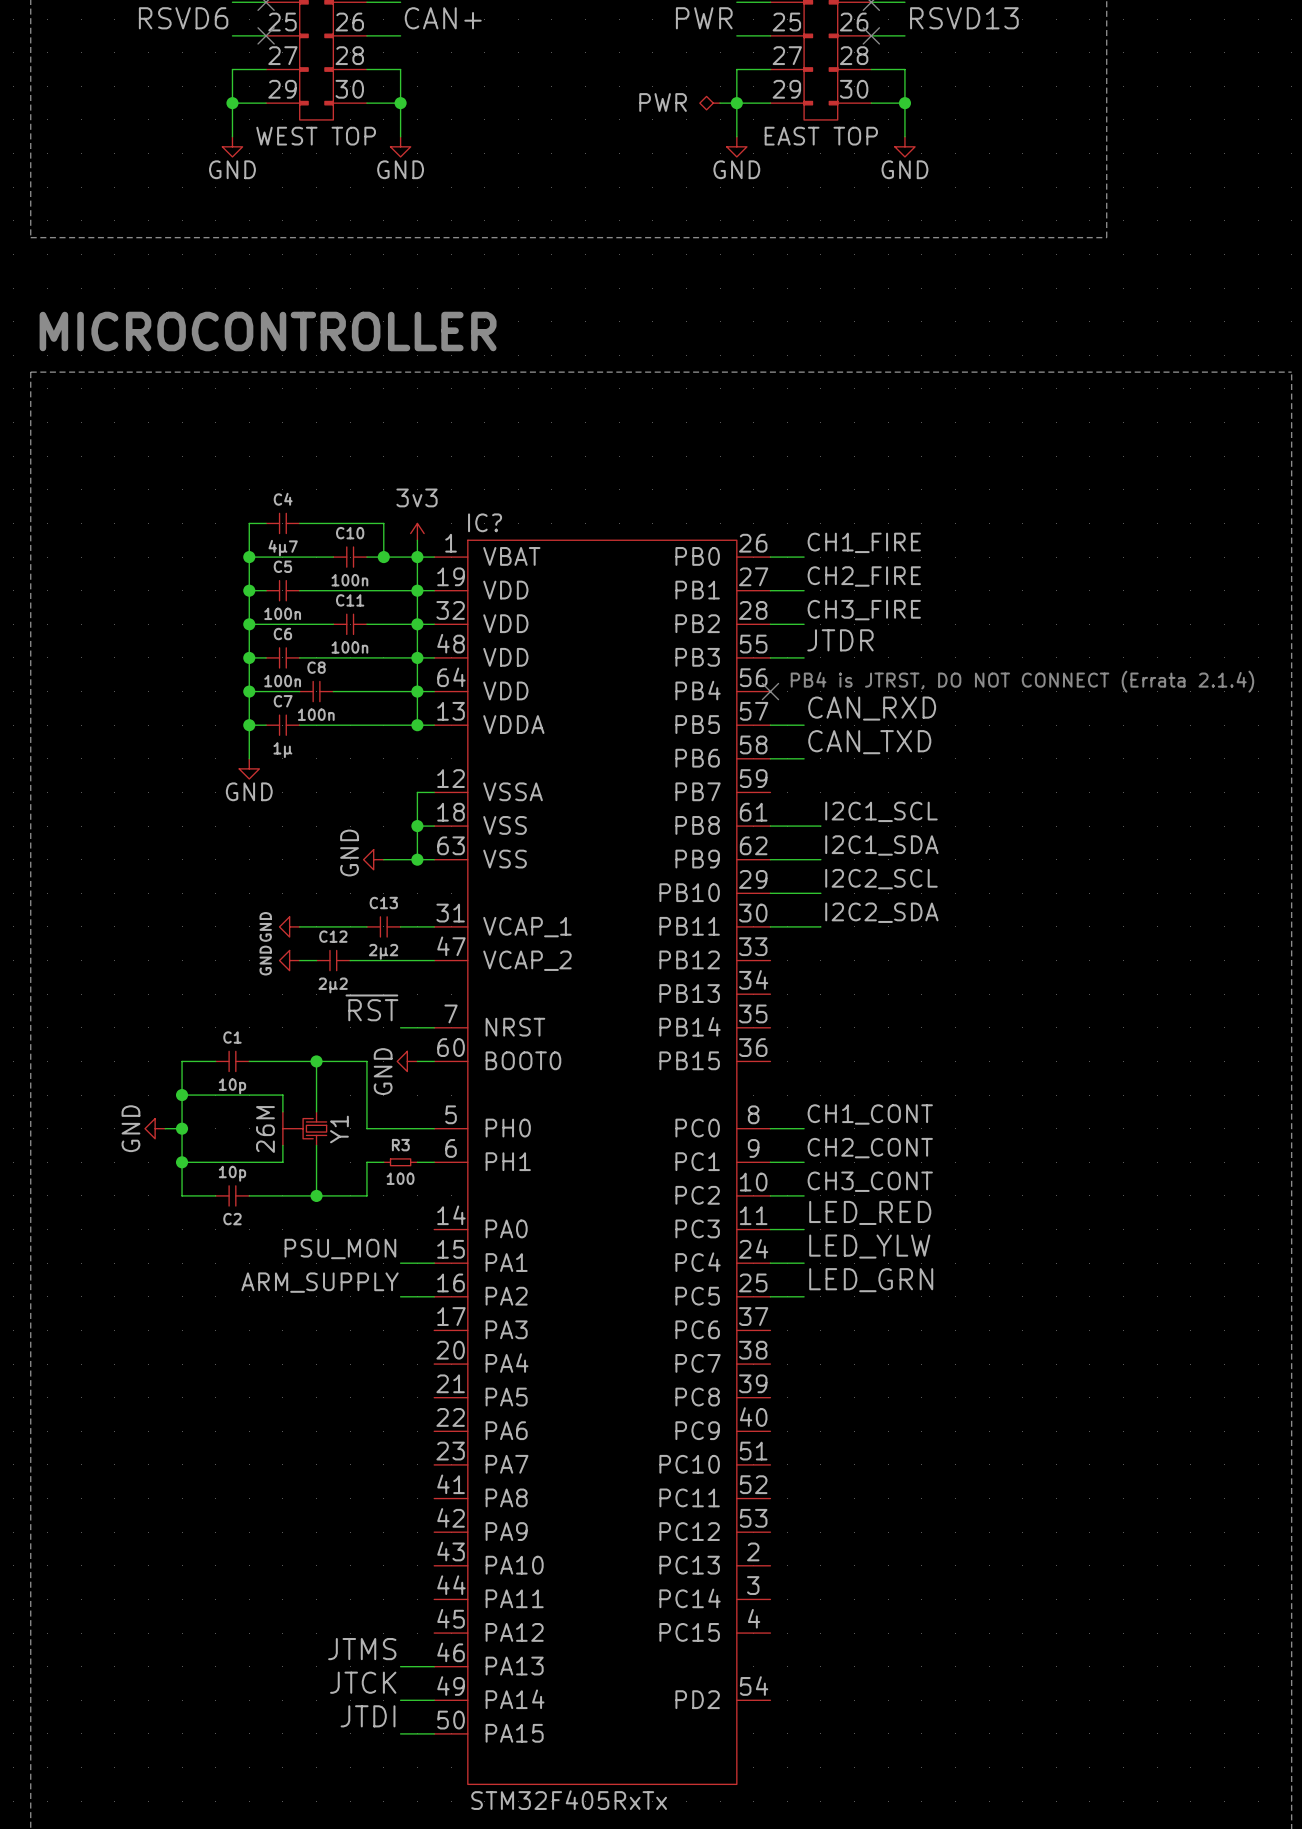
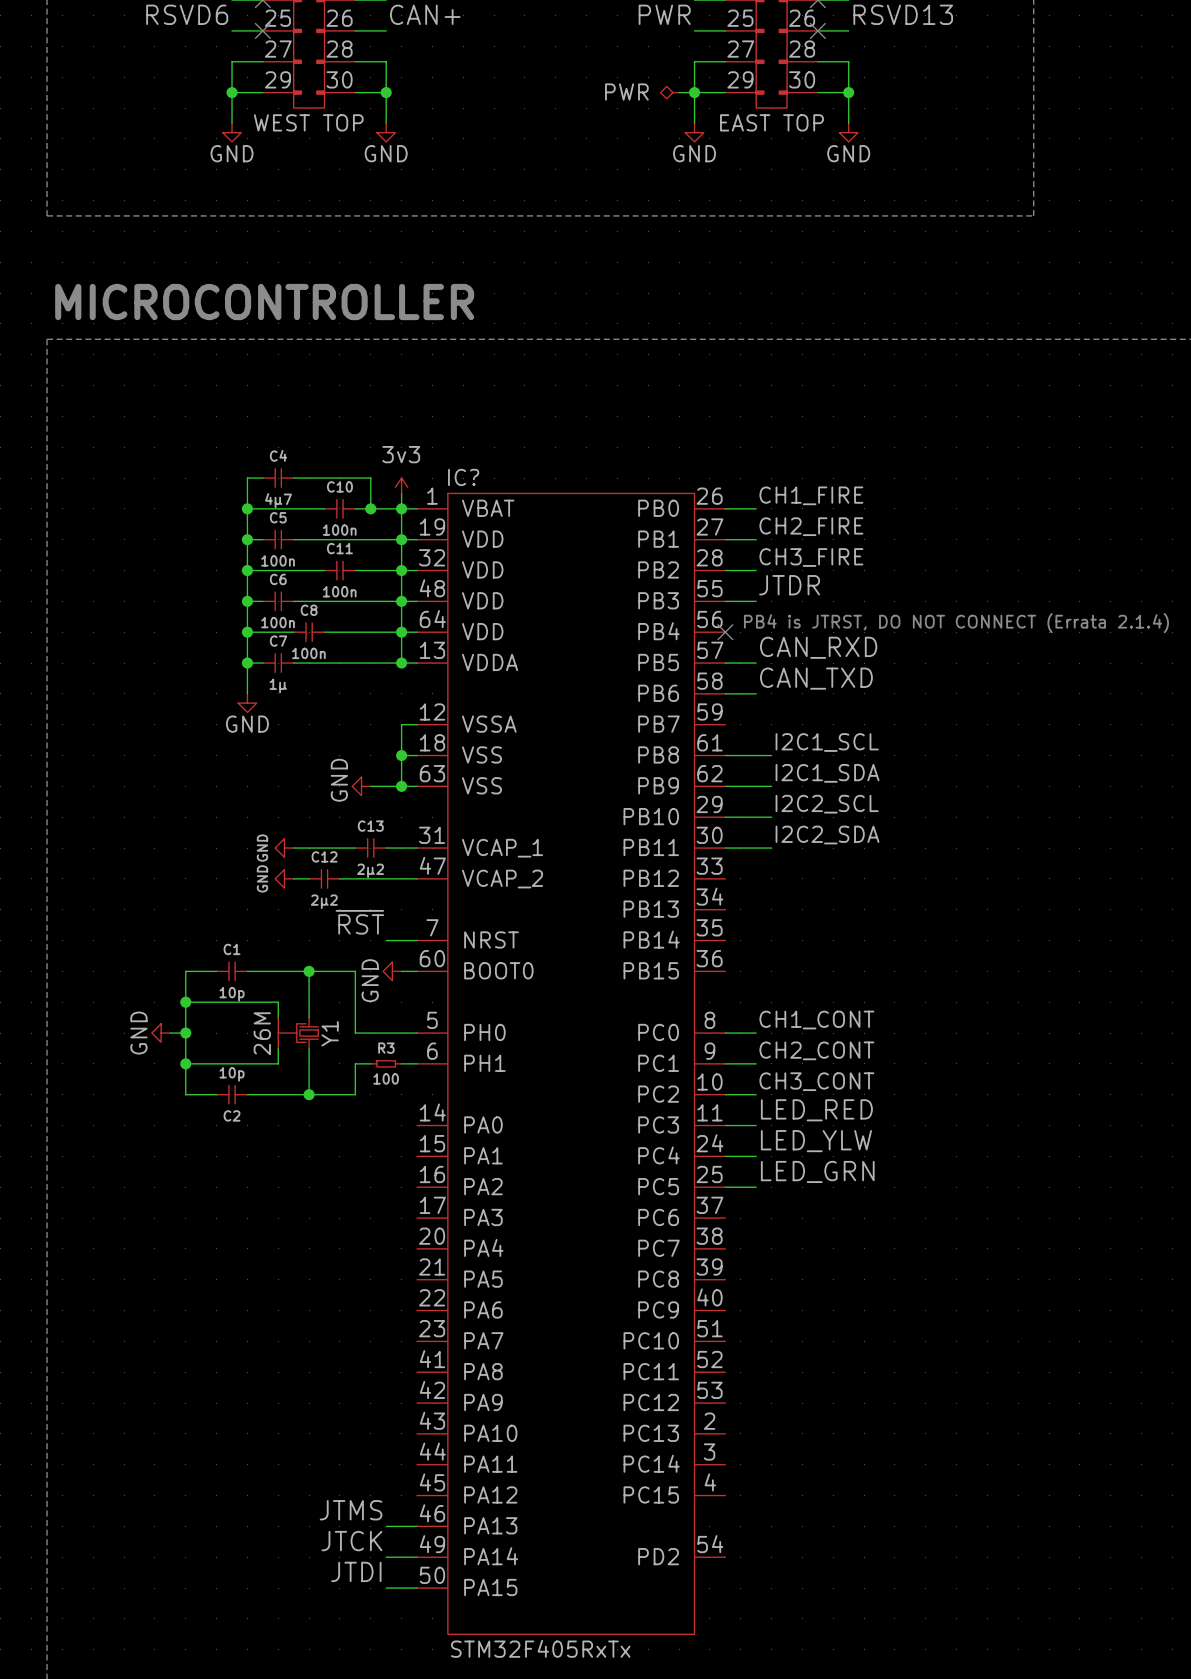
label: PSU_MON (340, 1248) -> none
wire: (400, 1263) (434, 1263) -> none
label: ARM_SUPPLY (320, 1282) -> none
wire: (400, 1296) (434, 1296) -> none

